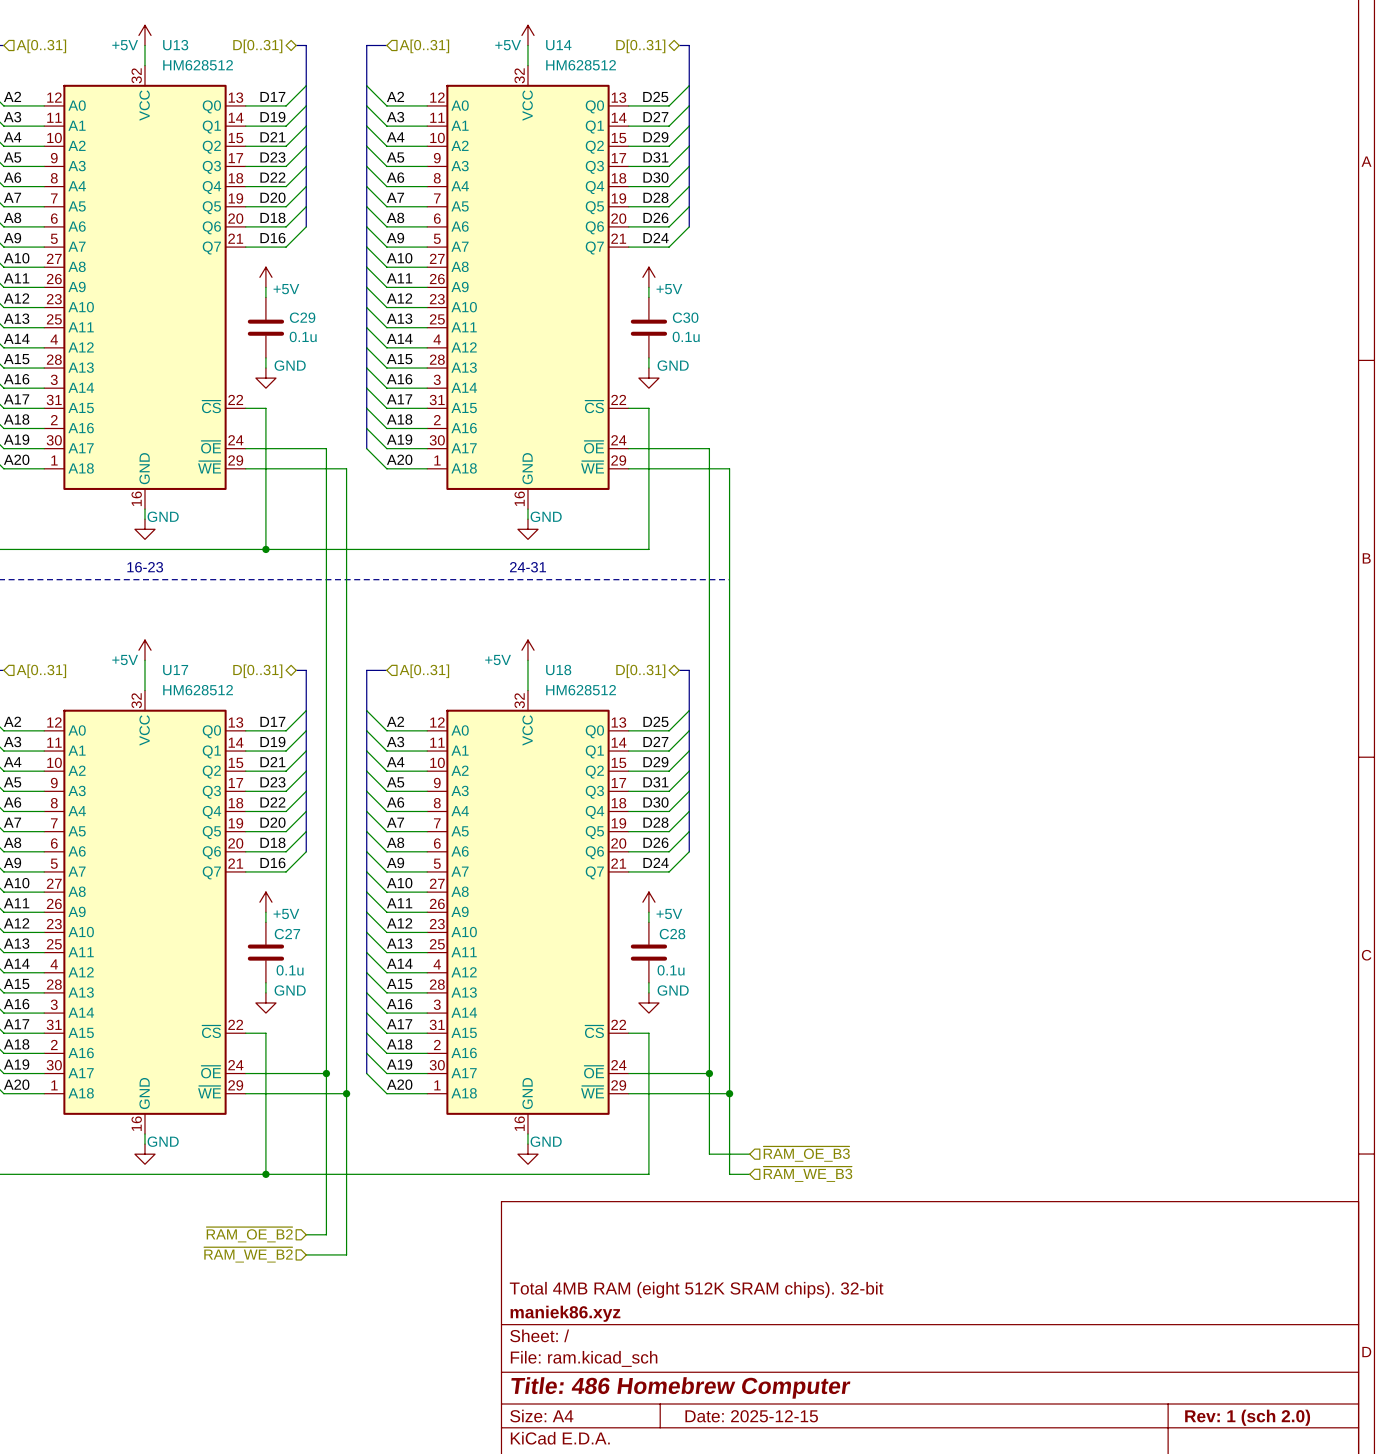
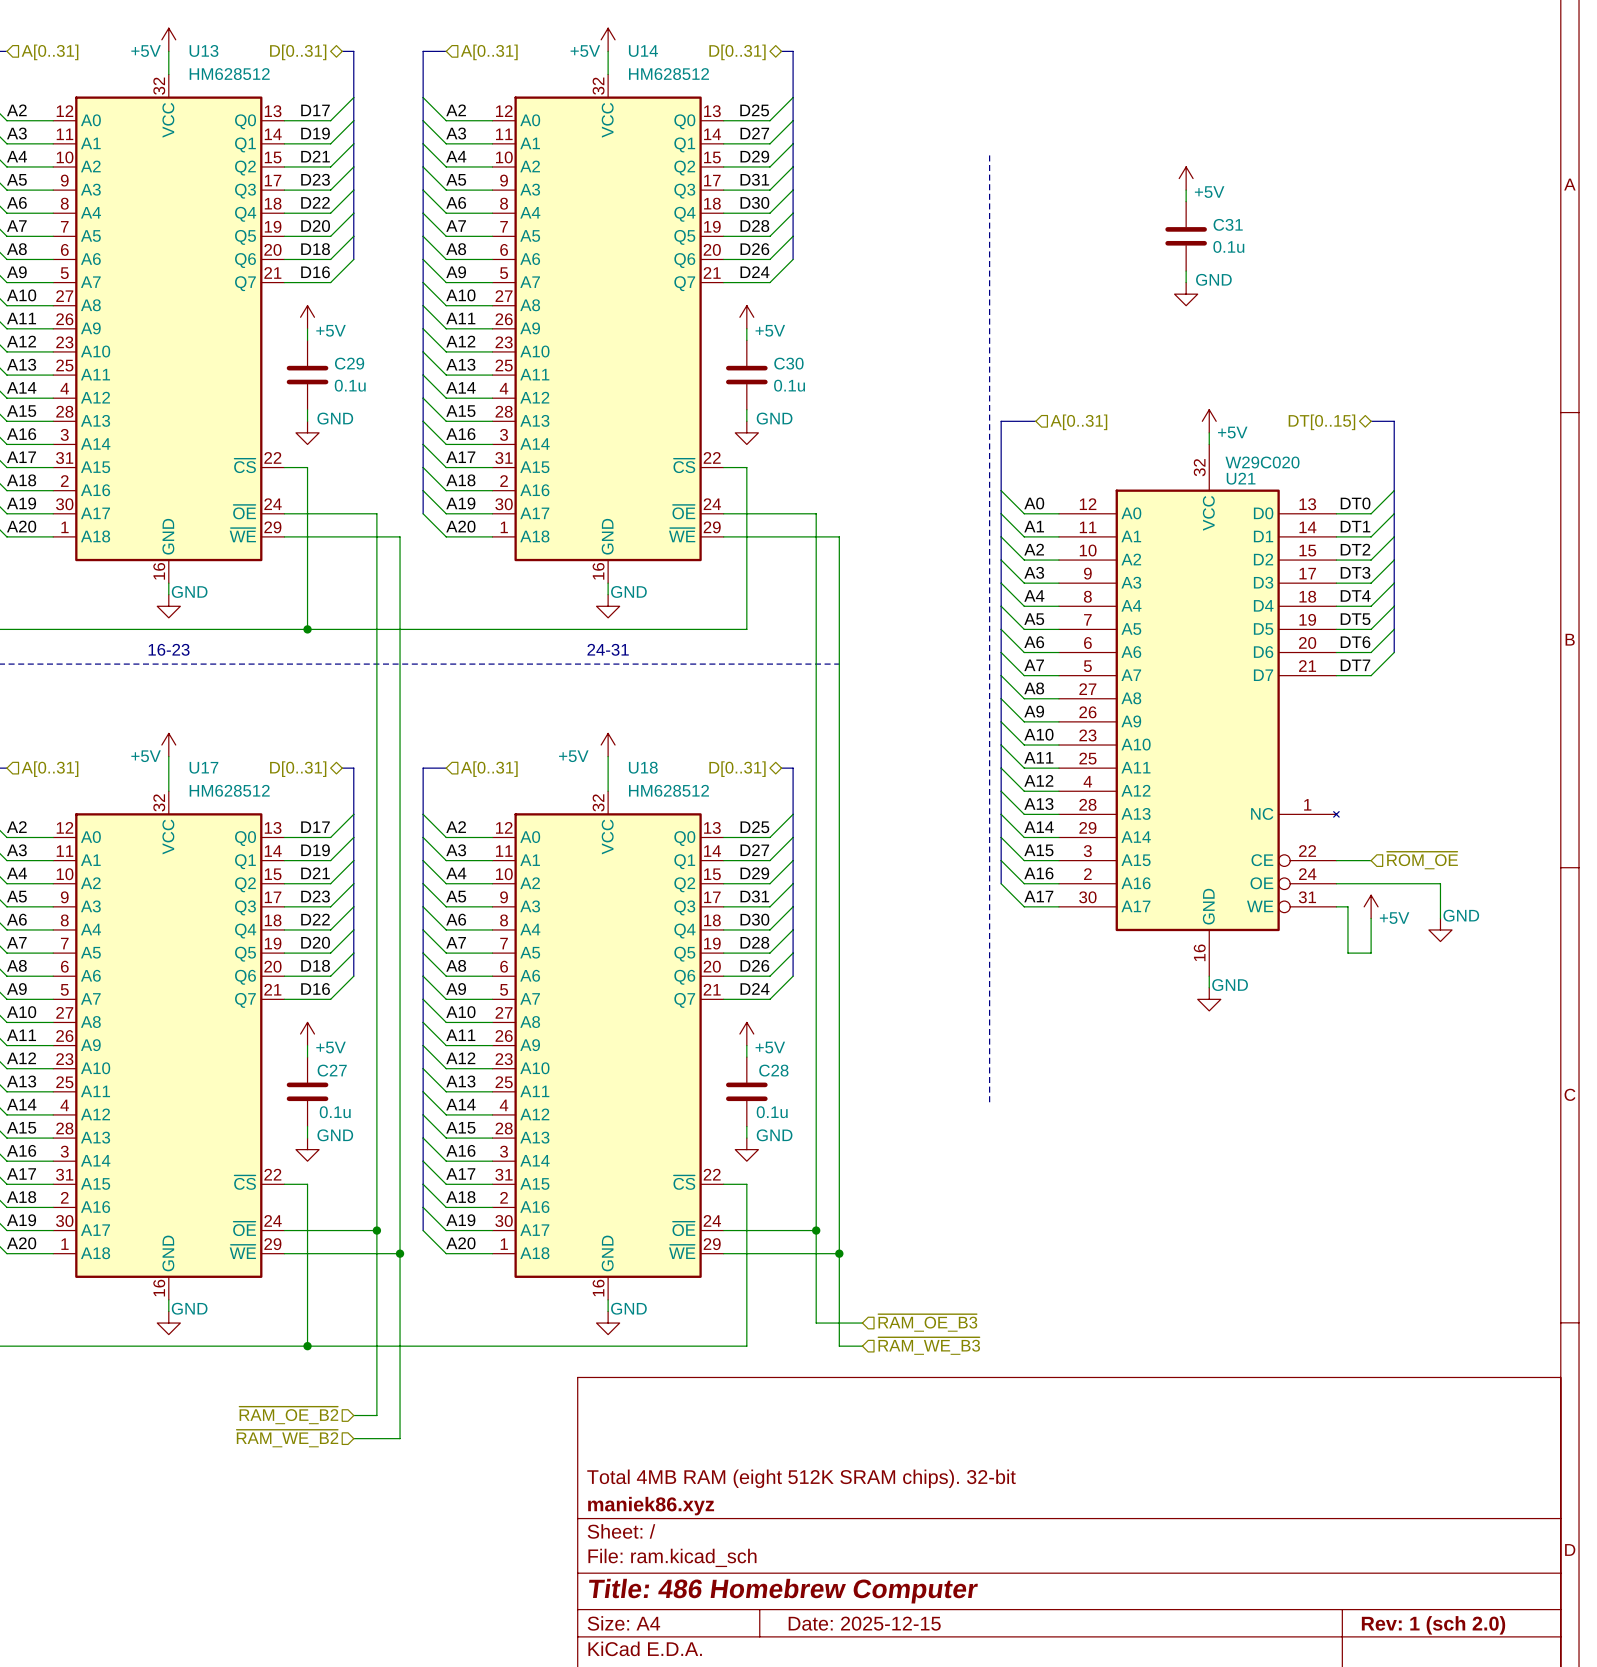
line: none -> (989, 155) (989, 1103)
power symbol: none -> +5V (1186, 178)
wire: none -> (1186, 190) (1186, 201)
C31: none -> 0.1u (1186, 236)
wire: none -> (1186, 271) (1186, 282)
power symbol: none -> GND (1186, 294)
bus: none -> (1035, 421) (1001, 421) (1001, 883)
hierarchical label: none -> A[0..31] (1078, 422)
power symbol: none -> +5V (1209, 421)
hierarchical label: none -> DT[0..15] (1321, 422)
bus: none -> (1371, 421) (1394, 421) (1394, 652)
wire: none -> (1209, 432) (1209, 444)
wire: none -> (1001, 490) (1024, 513) (1058, 513)
wire: none -> (1394, 490) (1371, 513) (1336, 513)
label: none -> A0 (1034, 503)
label: none -> DT0 (1355, 503)
wire: none -> (1001, 513) (1024, 536) (1058, 536)
wire: none -> (1394, 513) (1371, 536) (1336, 536)
label: none -> A1 (1034, 526)
label: none -> DT1 (1355, 526)
wire: none -> (1001, 536) (1024, 560) (1058, 560)
wire: none -> (1394, 536) (1371, 560) (1336, 560)
label: none -> A2 (1034, 549)
label: none -> DT2 (1355, 549)
wire: none -> (1001, 560) (1024, 583) (1058, 583)
wire: none -> (1394, 560) (1371, 583) (1336, 583)
label: none -> A3 (1034, 572)
label: none -> DT3 (1355, 572)
wire: none -> (1001, 583) (1024, 606) (1058, 606)
wire: none -> (1394, 583) (1371, 606) (1336, 606)
label: none -> A4 (1034, 595)
label: none -> DT4 (1355, 595)
wire: none -> (1001, 606) (1024, 629) (1058, 629)
wire: none -> (1394, 606) (1371, 629) (1336, 629)
label: none -> A5 (1034, 619)
label: none -> DT5 (1355, 619)
wire: none -> (1001, 629) (1024, 652) (1058, 652)
wire: none -> (1394, 629) (1371, 652) (1336, 652)
label: none -> A6 (1034, 642)
label: none -> DT6 (1355, 642)
wire: none -> (1001, 652) (1024, 675) (1058, 675)
wire: none -> (1394, 652) (1371, 675) (1336, 675)
label: none -> A7 (1034, 665)
label: none -> DT7 (1355, 665)
wire: none -> (1001, 675) (1024, 698) (1058, 698)
label: none -> A8 (1034, 688)
wire: none -> (1001, 698) (1024, 721) (1058, 721)
U21: none -> W29C020 (1199, 710)
label: none -> A9 (1034, 711)
wire: none -> (1001, 721) (1024, 745) (1058, 745)
label: none -> A10 (1038, 734)
wire: none -> (1001, 745) (1024, 768) (1058, 768)
label: none -> A11 (1038, 757)
wire: none -> (1001, 768) (1024, 791) (1058, 791)
label: none -> A12 (1038, 780)
wire: none -> (1001, 791) (1024, 814) (1058, 814)
label: none -> A13 (1038, 804)
wire: none -> (1001, 814) (1024, 837) (1058, 837)
label: none -> A14 (1039, 827)
wire: none -> (1001, 837) (1024, 860) (1058, 860)
label: none -> A15 (1038, 850)
hierarchical label: none -> ~{ROM_OE} (1422, 860)
wire: none -> (1001, 860) (1024, 883) (1058, 883)
wire: none -> (1336, 860) (1371, 860)
label: none -> A16 (1038, 873)
wire: none -> (1001, 883) (1024, 906) (1058, 906)
wire: none -> (1336, 883) (1440, 883) (1440, 918)
label: none -> A17 (1038, 896)
wire: none -> (1336, 906) (1347, 906) (1347, 953) (1371, 953) (1371, 918)
power symbol: none -> +5V (1371, 906)
power symbol: none -> GND (1440, 929)
wire: none -> (1209, 976) (1209, 987)
power symbol: none -> GND (1209, 999)

